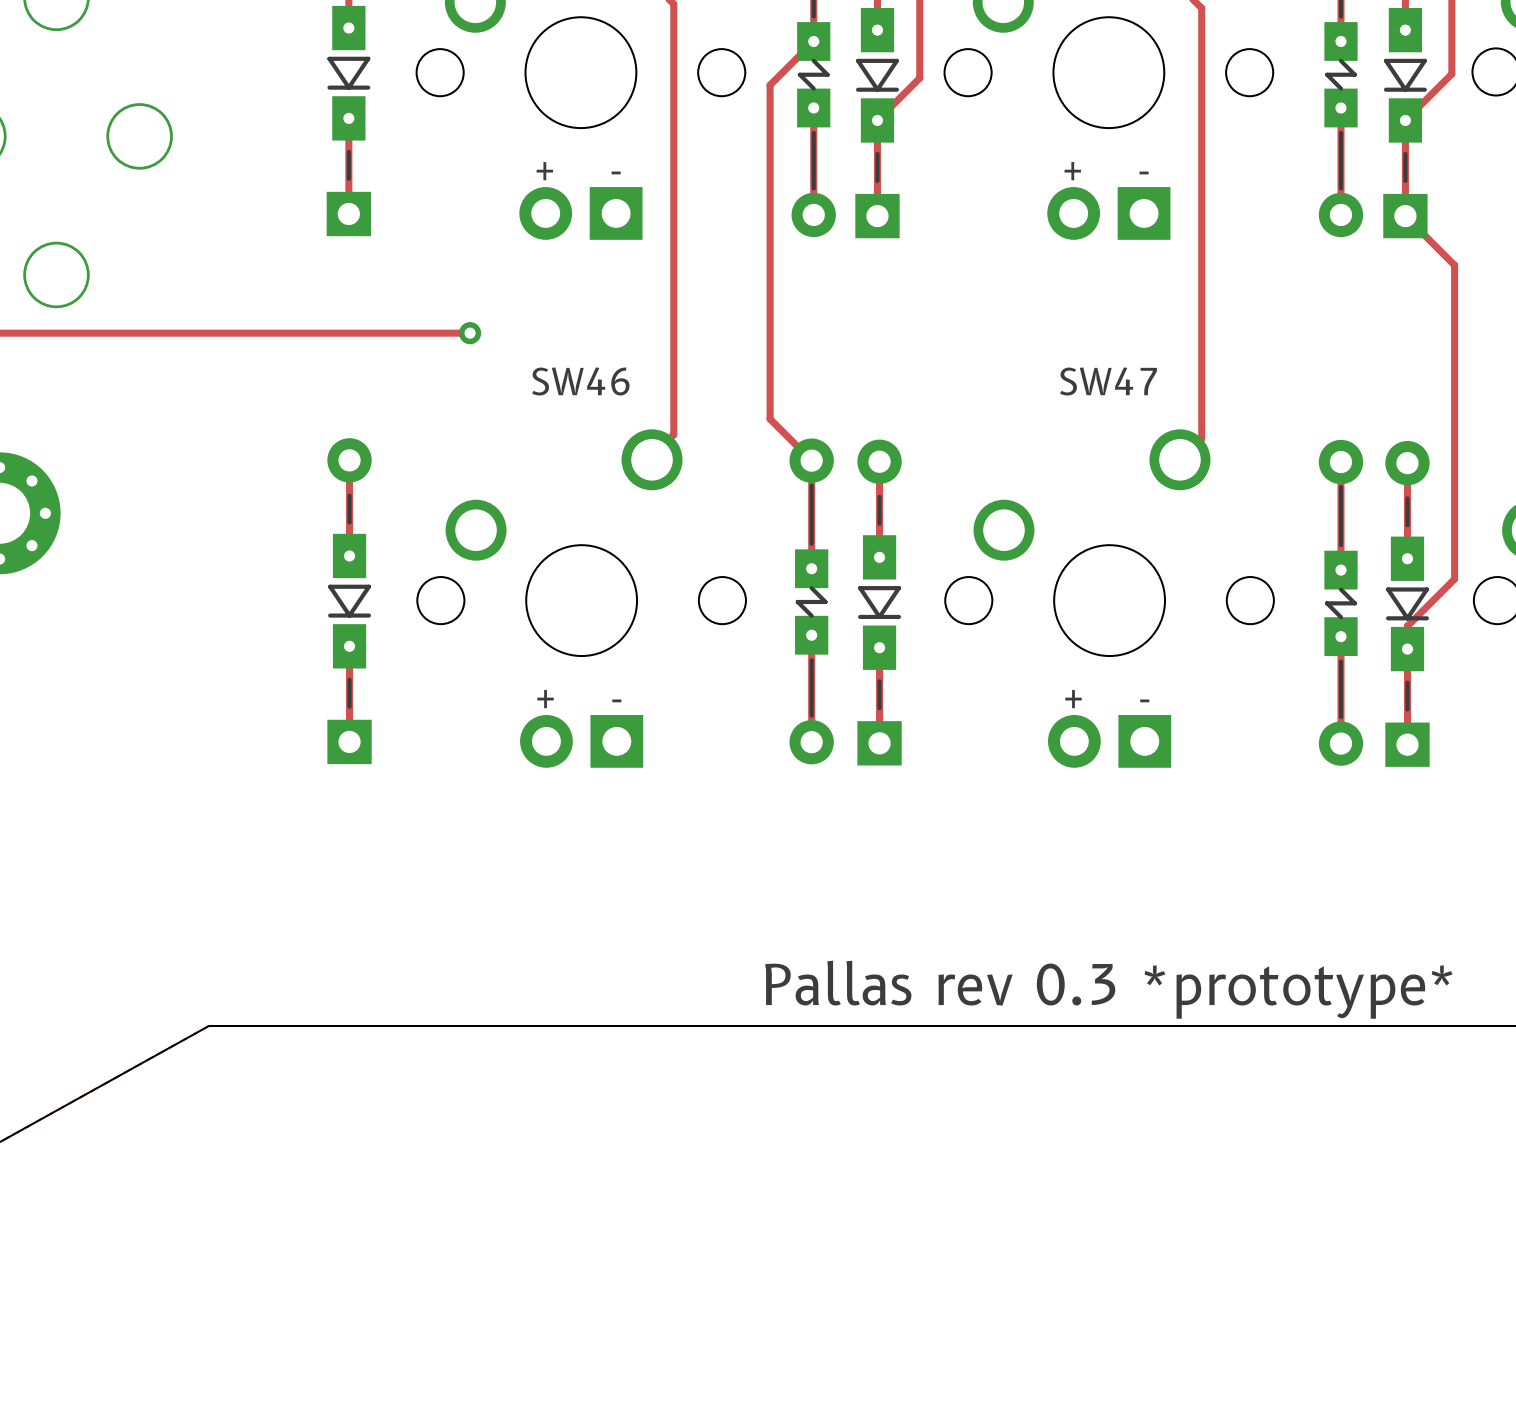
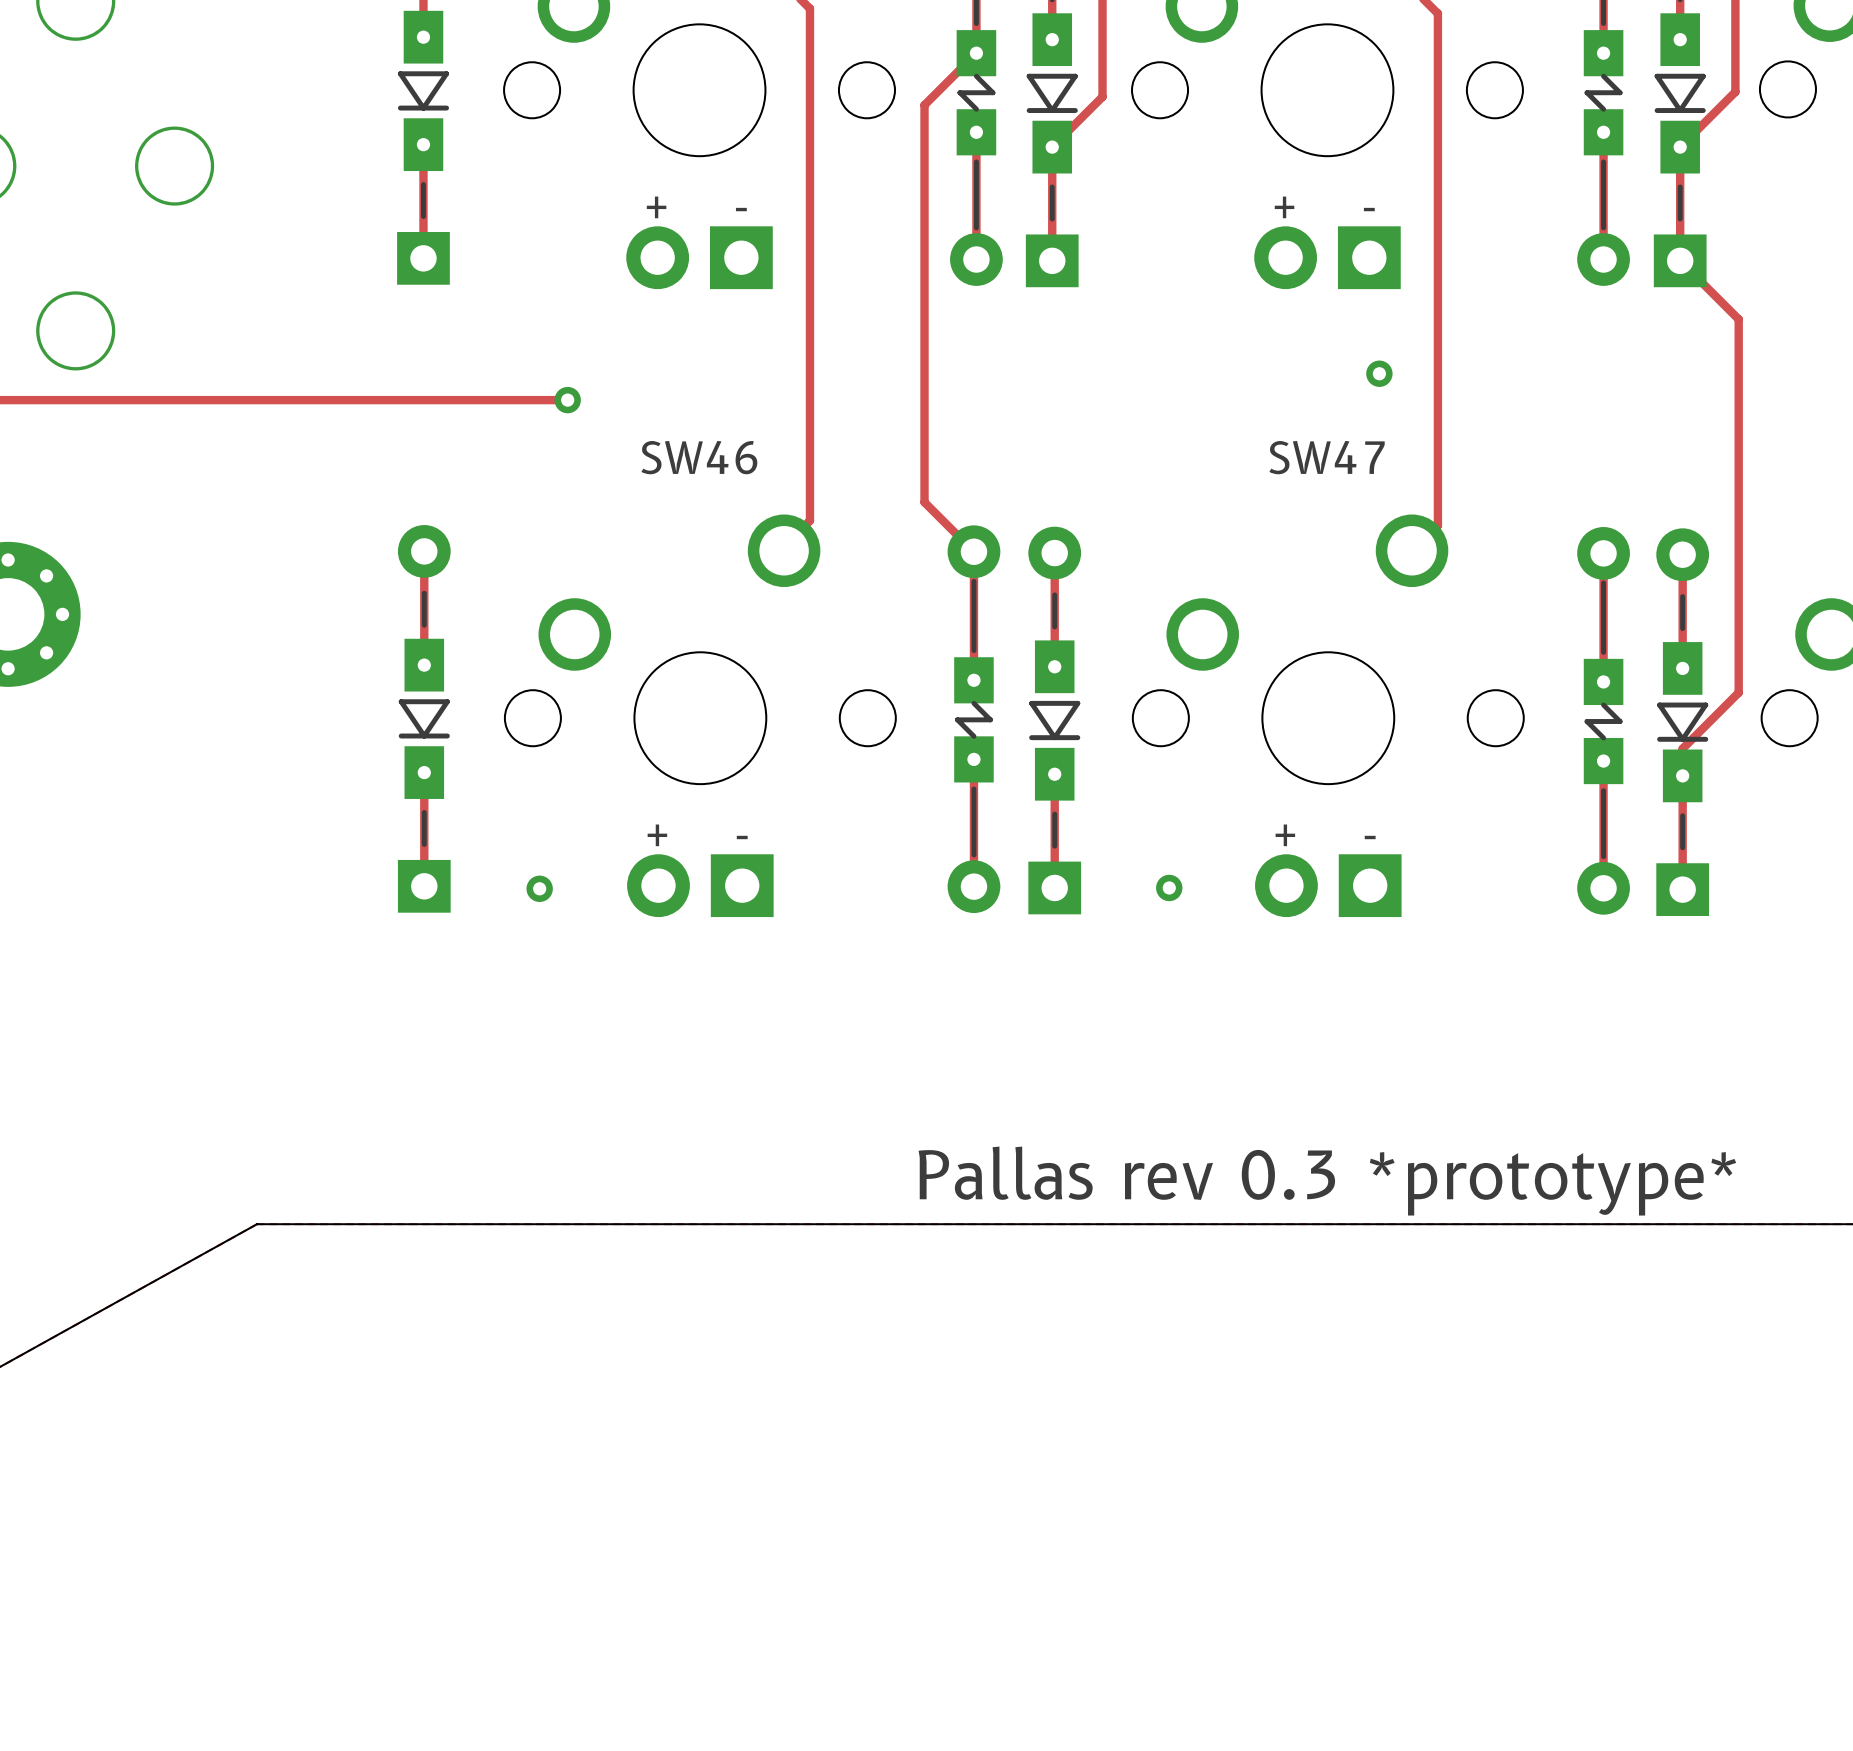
via: none -> (1379, 373)
via: none -> (1169, 887)
via: none -> (539, 888)

